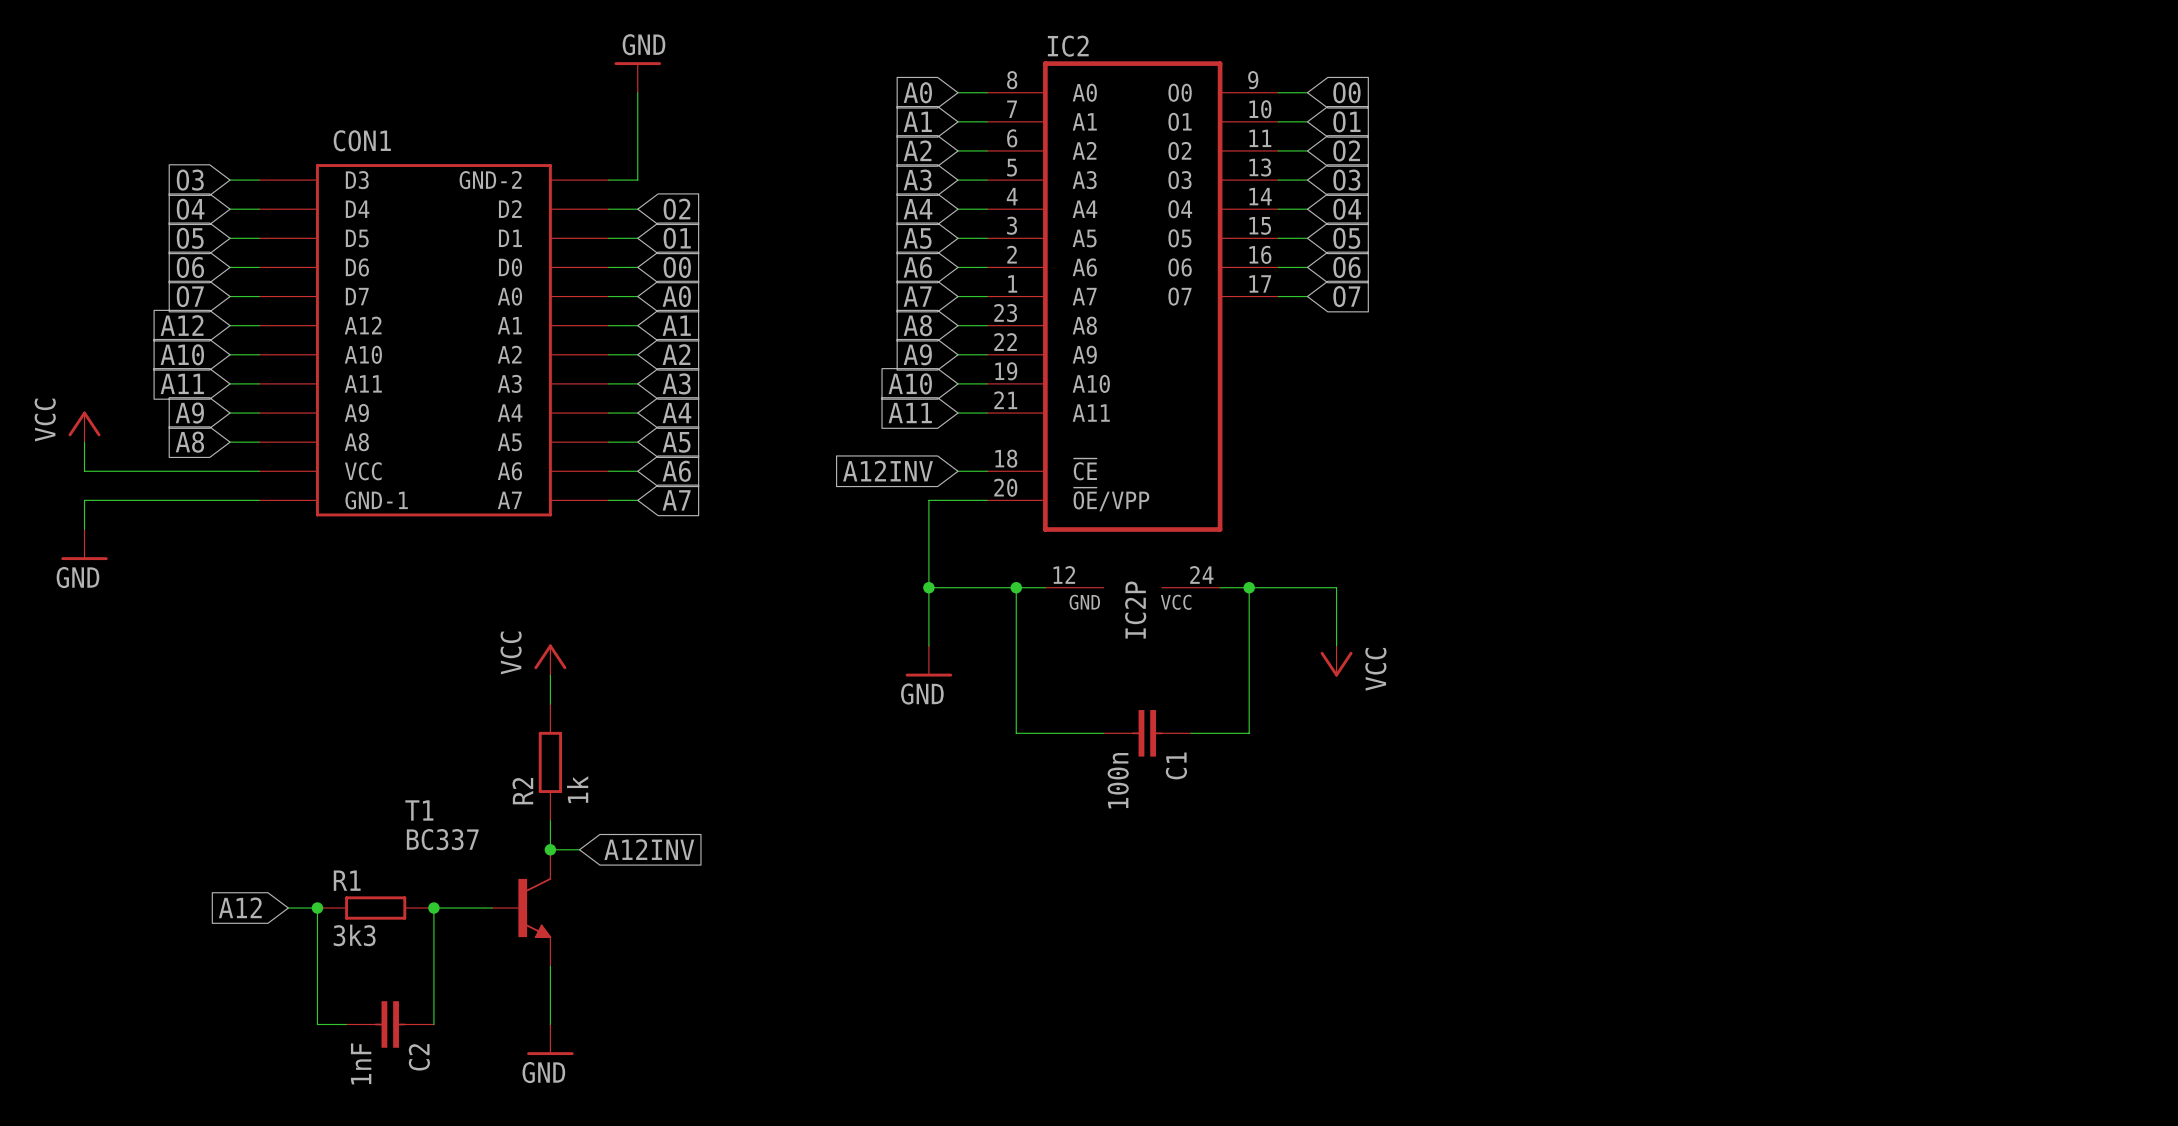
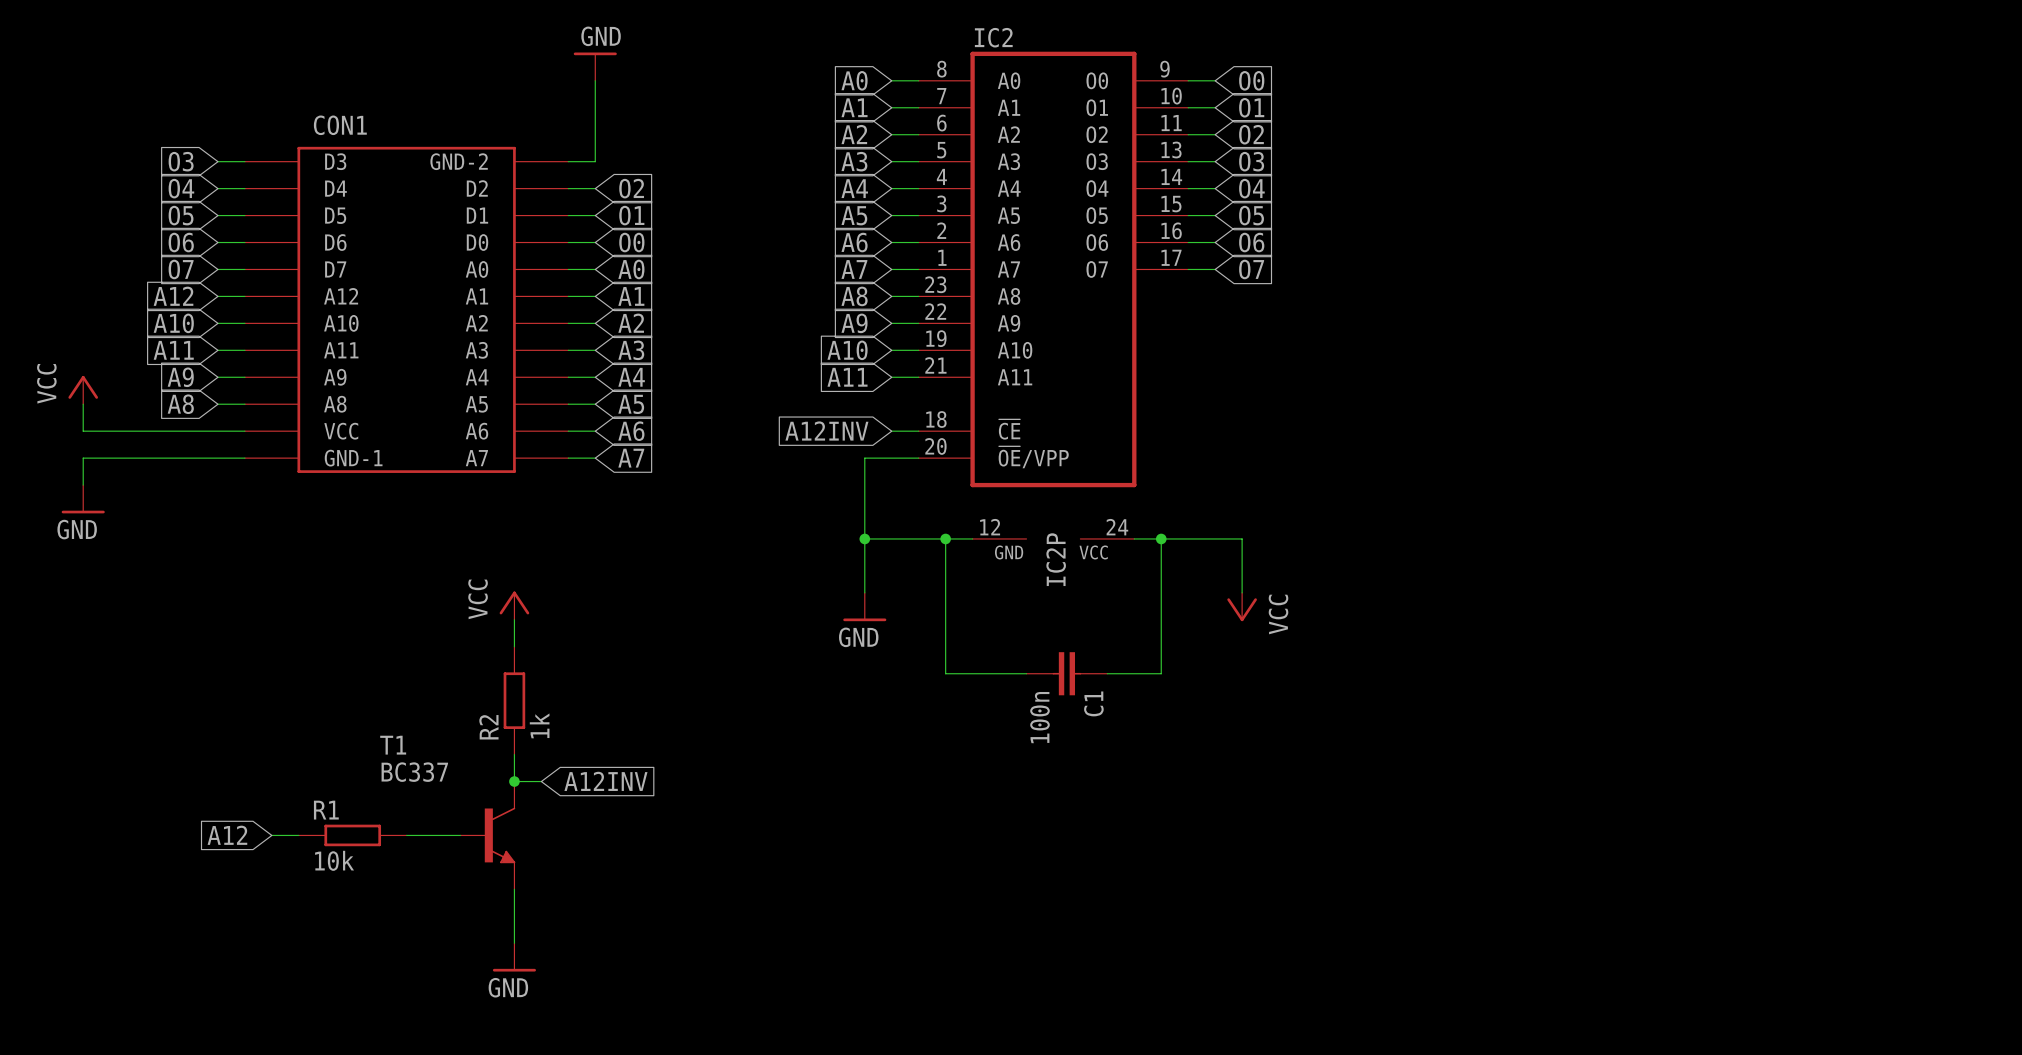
wire: (317, 908) (317, 1024) (346, 1024) -> none
junction: (317, 908) -> none
wire: (433, 908) (433, 1024) -> none
junction: (433, 908) -> none
R1 value: 3k3 (354, 935) -> 10k (334, 860)
C2: 1nF (390, 1024) -> none

